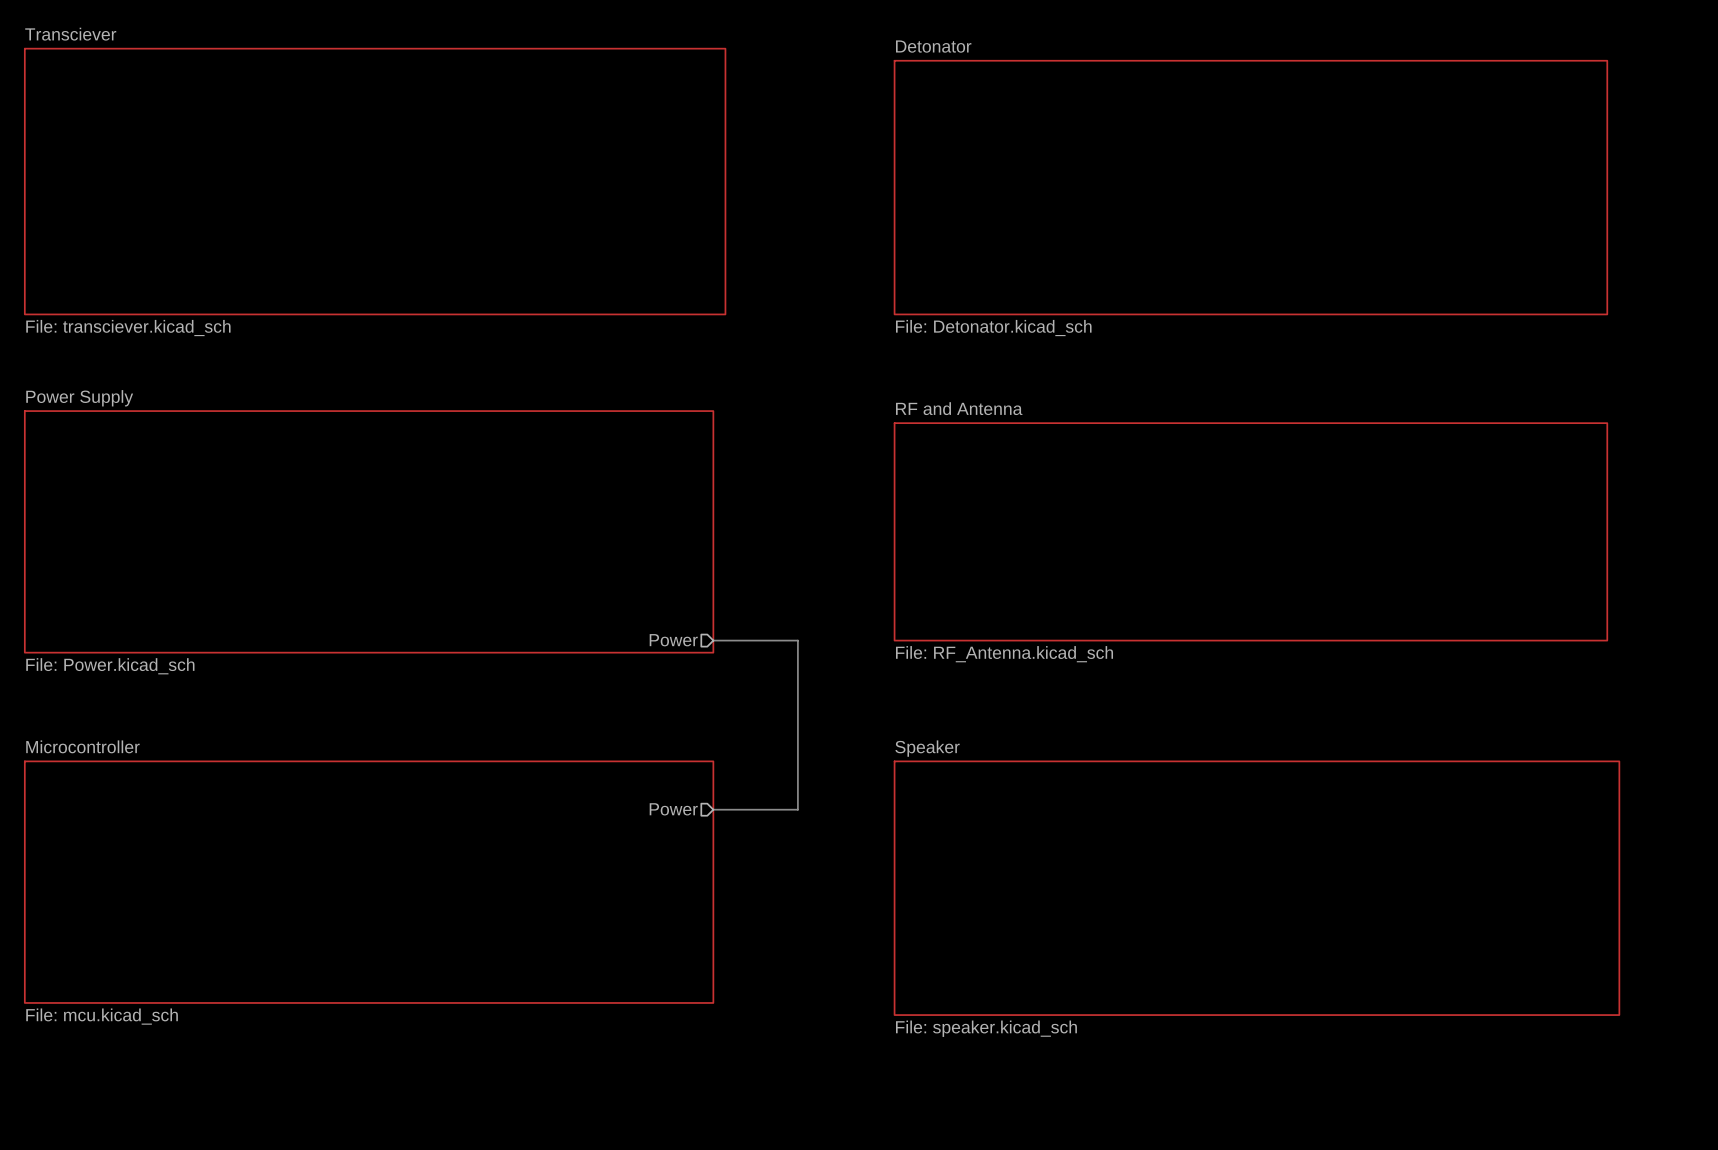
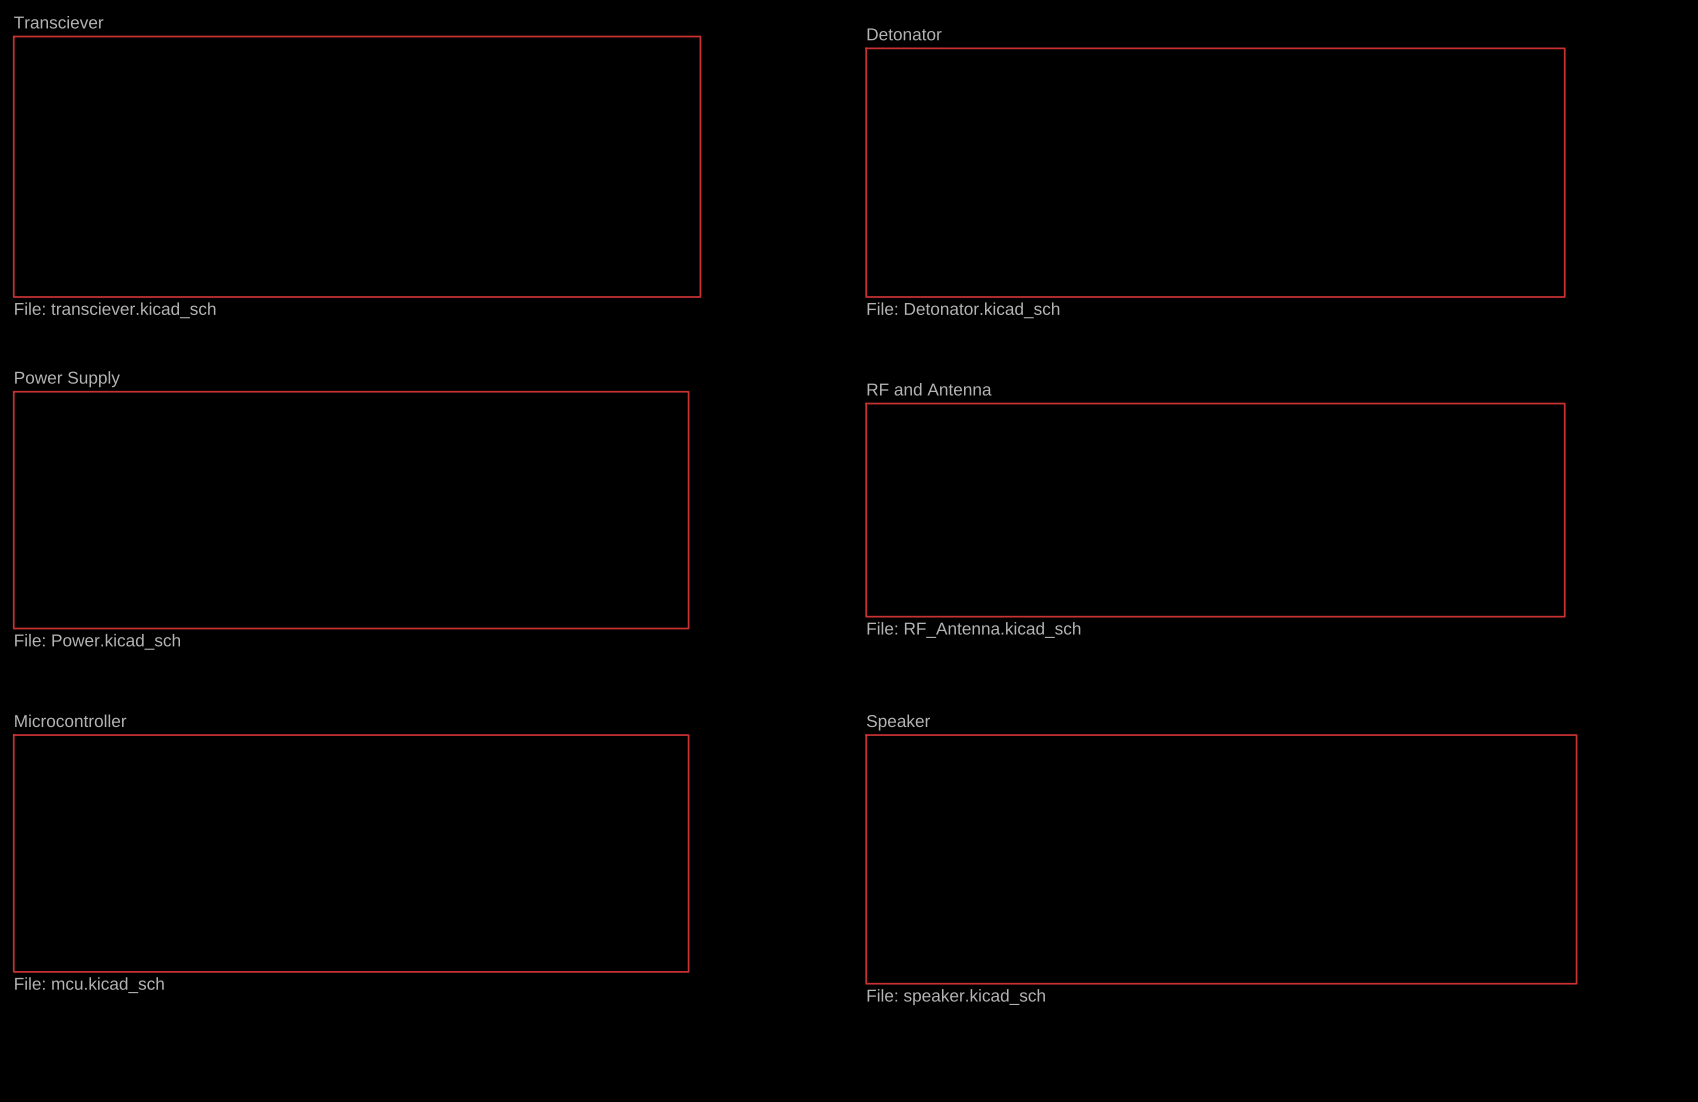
hierarchical label: Power (673, 640) -> none
bus: (713, 640) (797, 640) (797, 809) (713, 809) -> none
hierarchical label: Power (673, 809) -> none

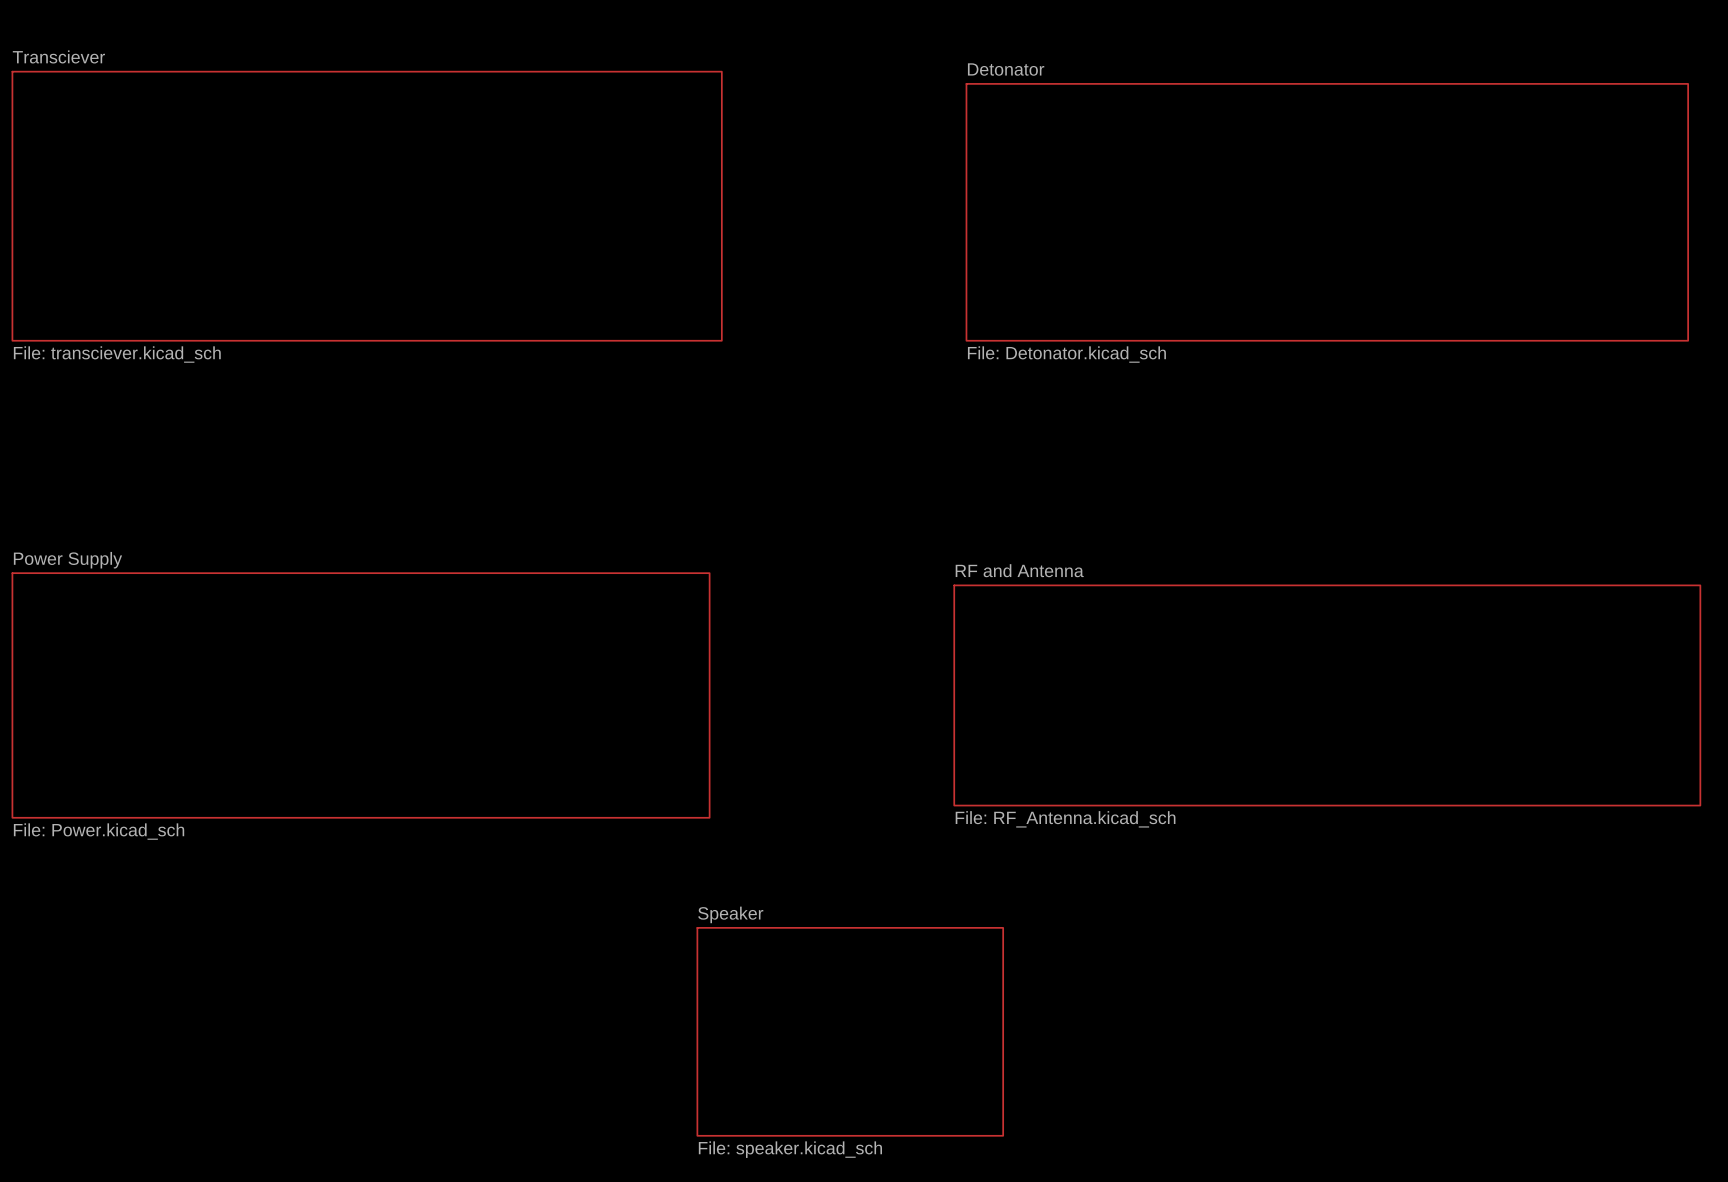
sheet Detonator position: (1215, 172) -> (1327, 212)
sheet Power Supply position: (351, 510) -> (361, 695)
sheet RF and Antenna: File: RF_Antenna.kicad_sch (1215, 510) -> none
sheet RF and Antenna: none -> File: RF_Antenna.kicad_sch (1327, 695)
sheet Microcontroller: File: mcu.kicad_sch (351, 853) -> none
sheet Speaker: File: speaker.kicad_sch (1221, 859) -> none
sheet Speaker: none -> File: speaker.kicad_sch (850, 1031)

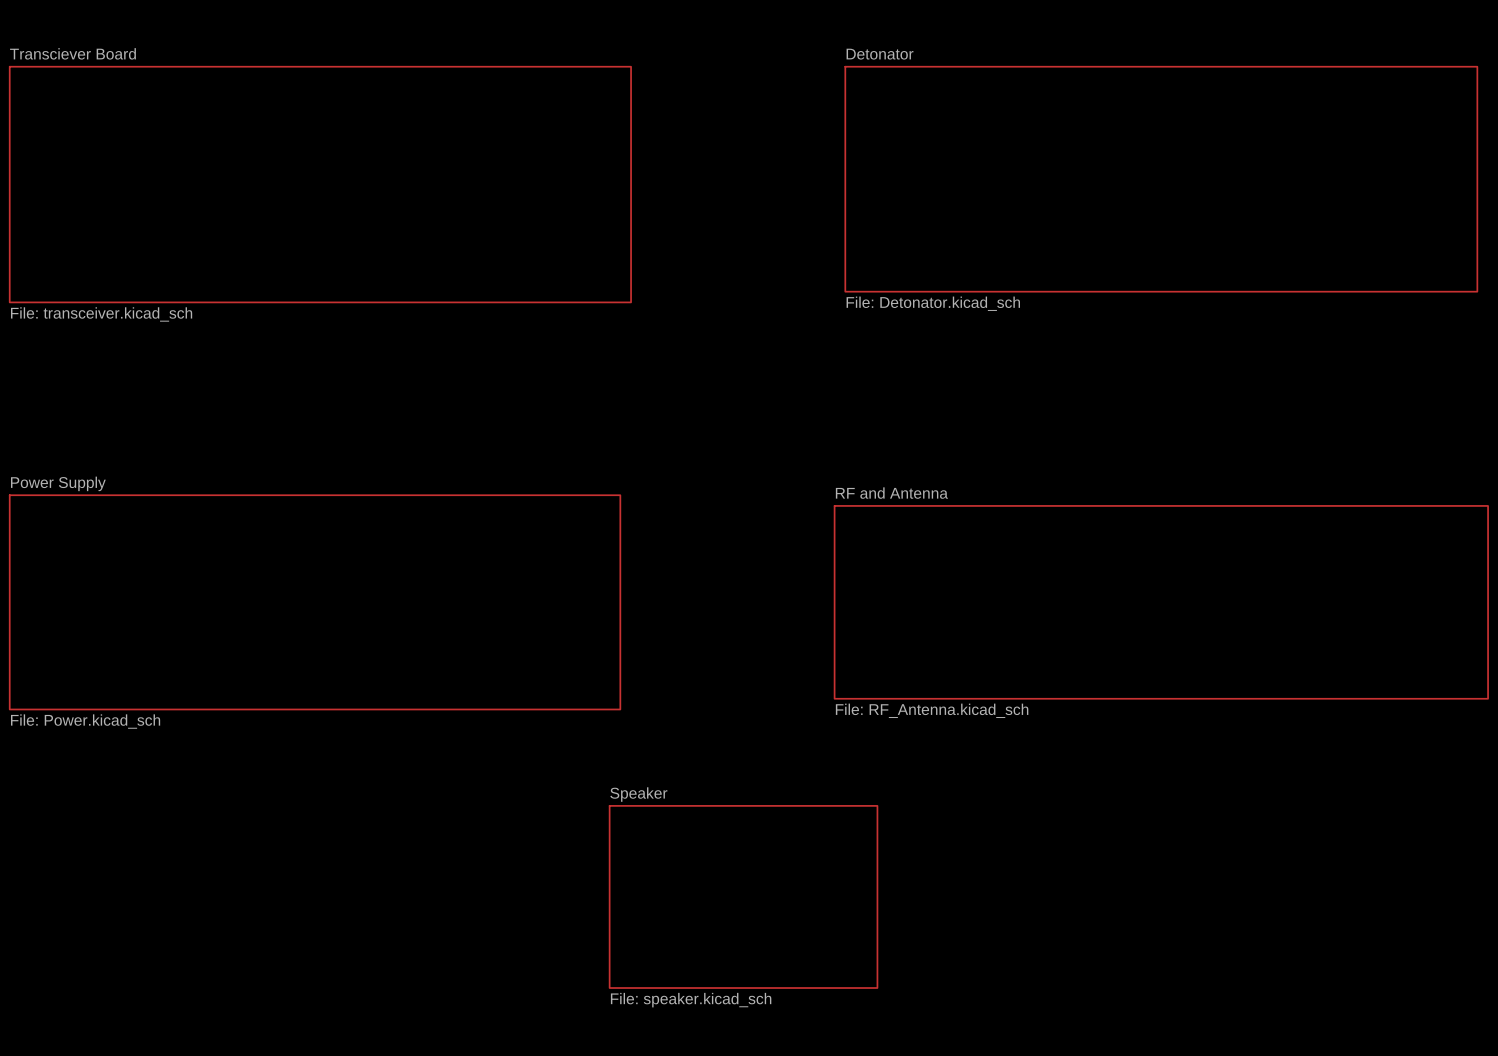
sheet Transciever: File: transciever.kicad_sch (367, 206) -> none
sheet Transciever Board: none -> File: transceiver.kicad_sch (320, 184)

